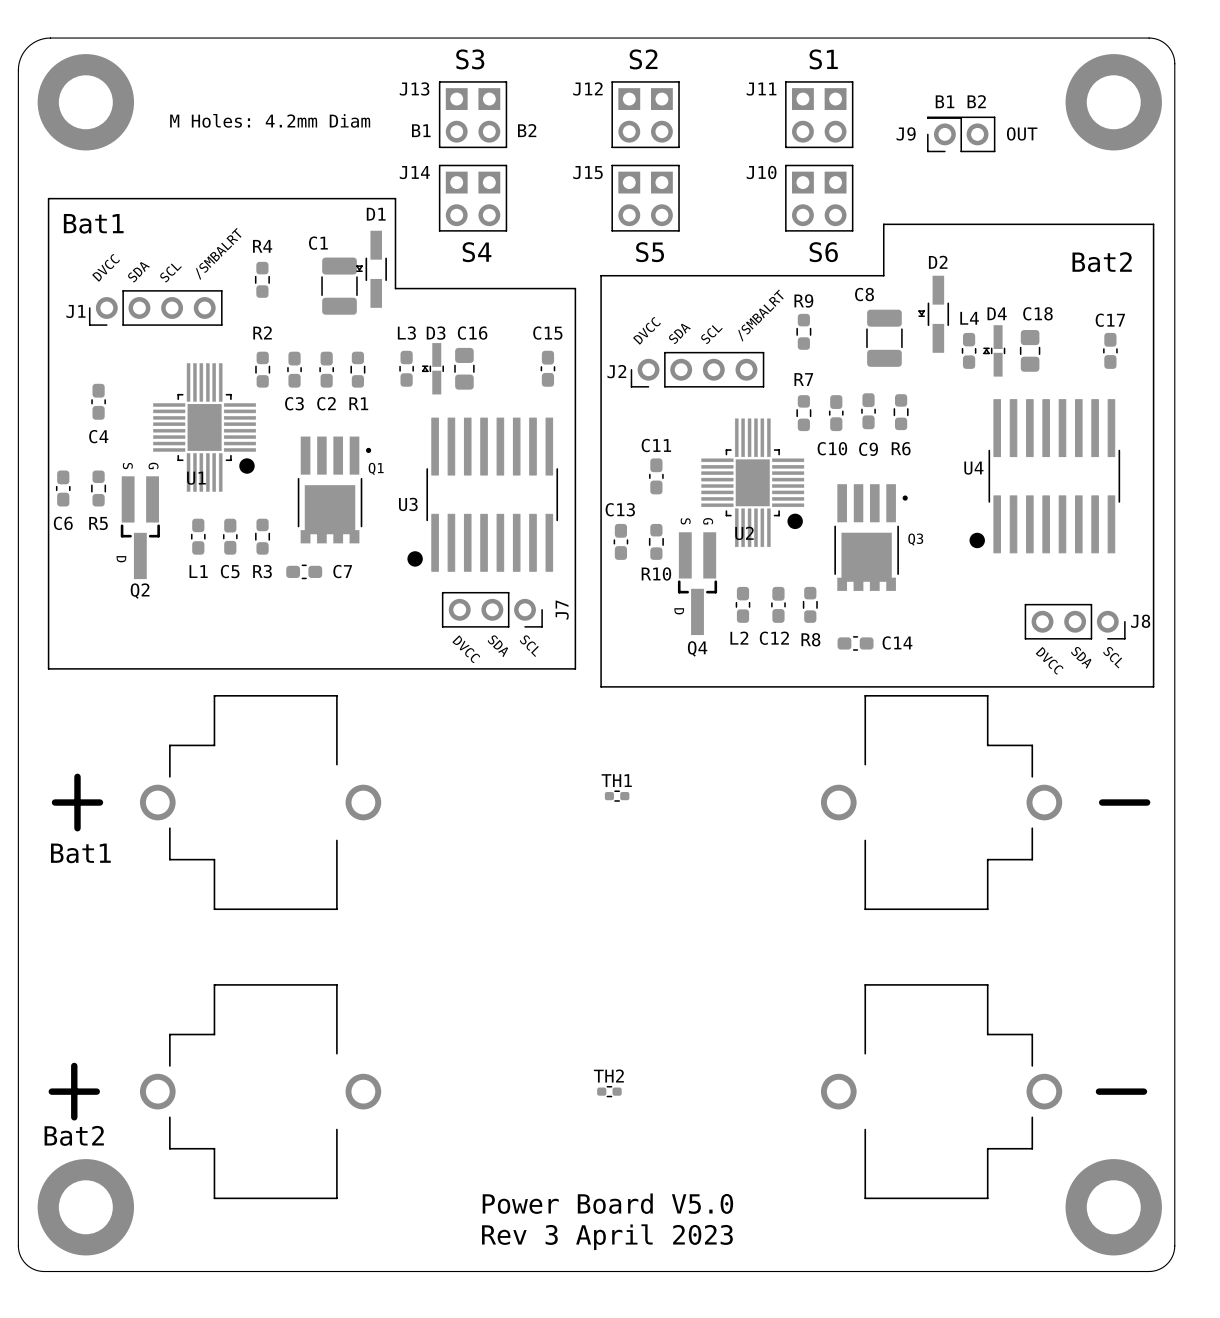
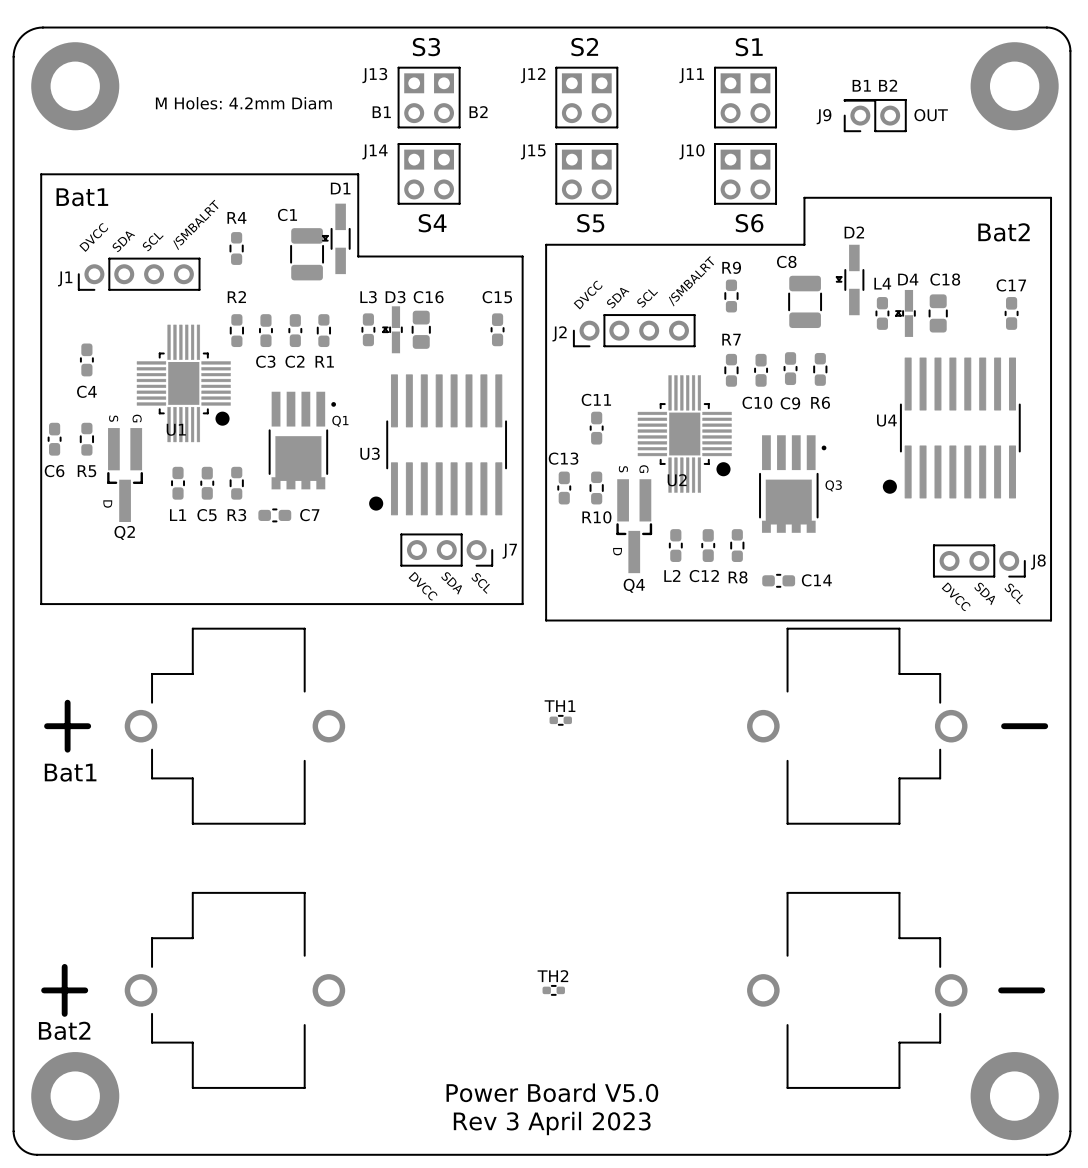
J7 name rotation: 0° (562, 609) -> 90° clockwise (509, 551)

